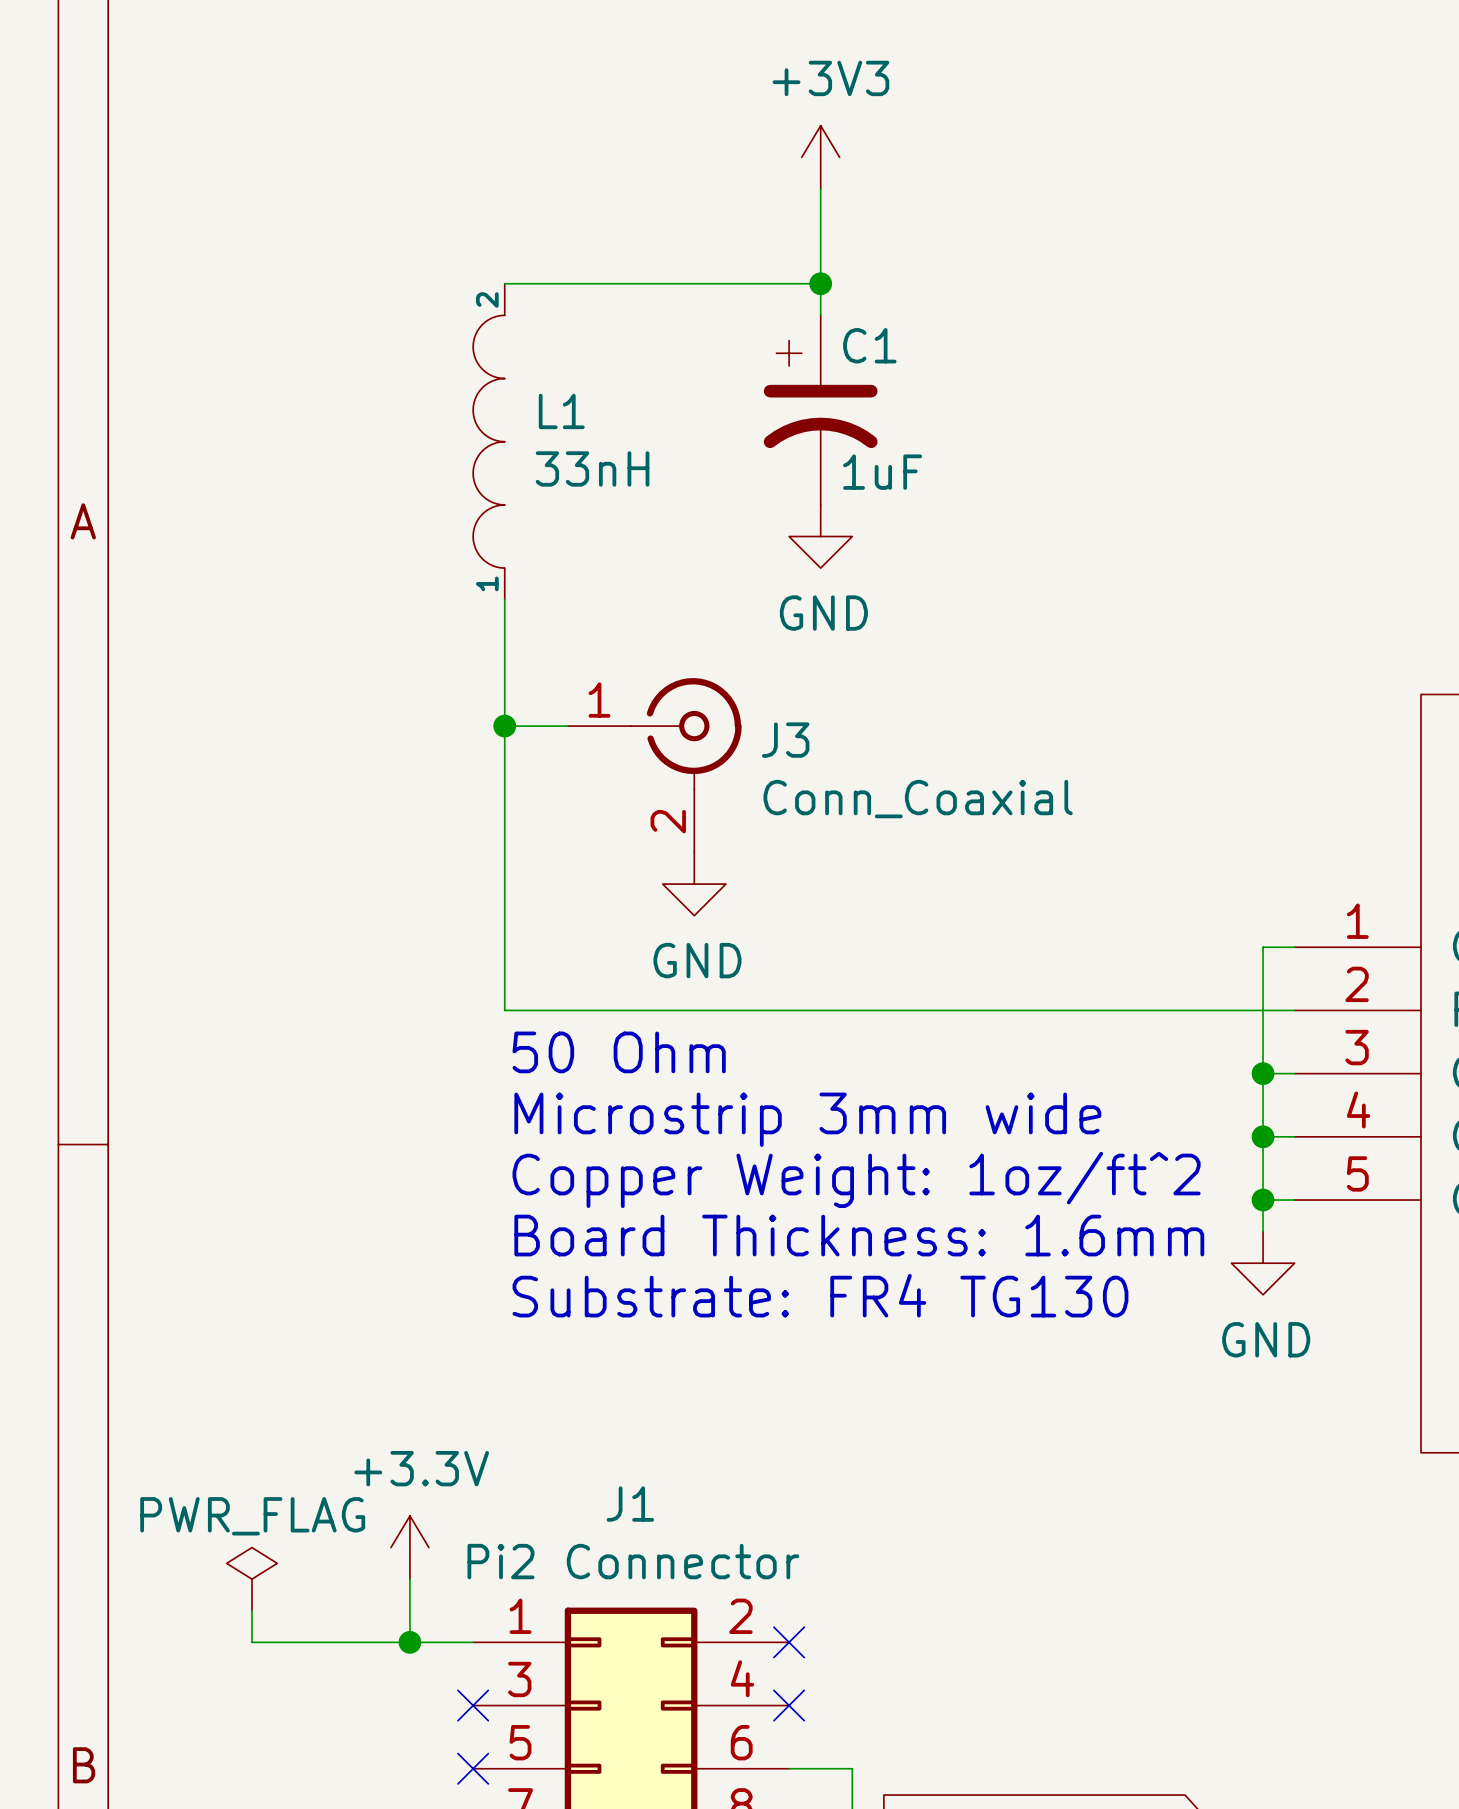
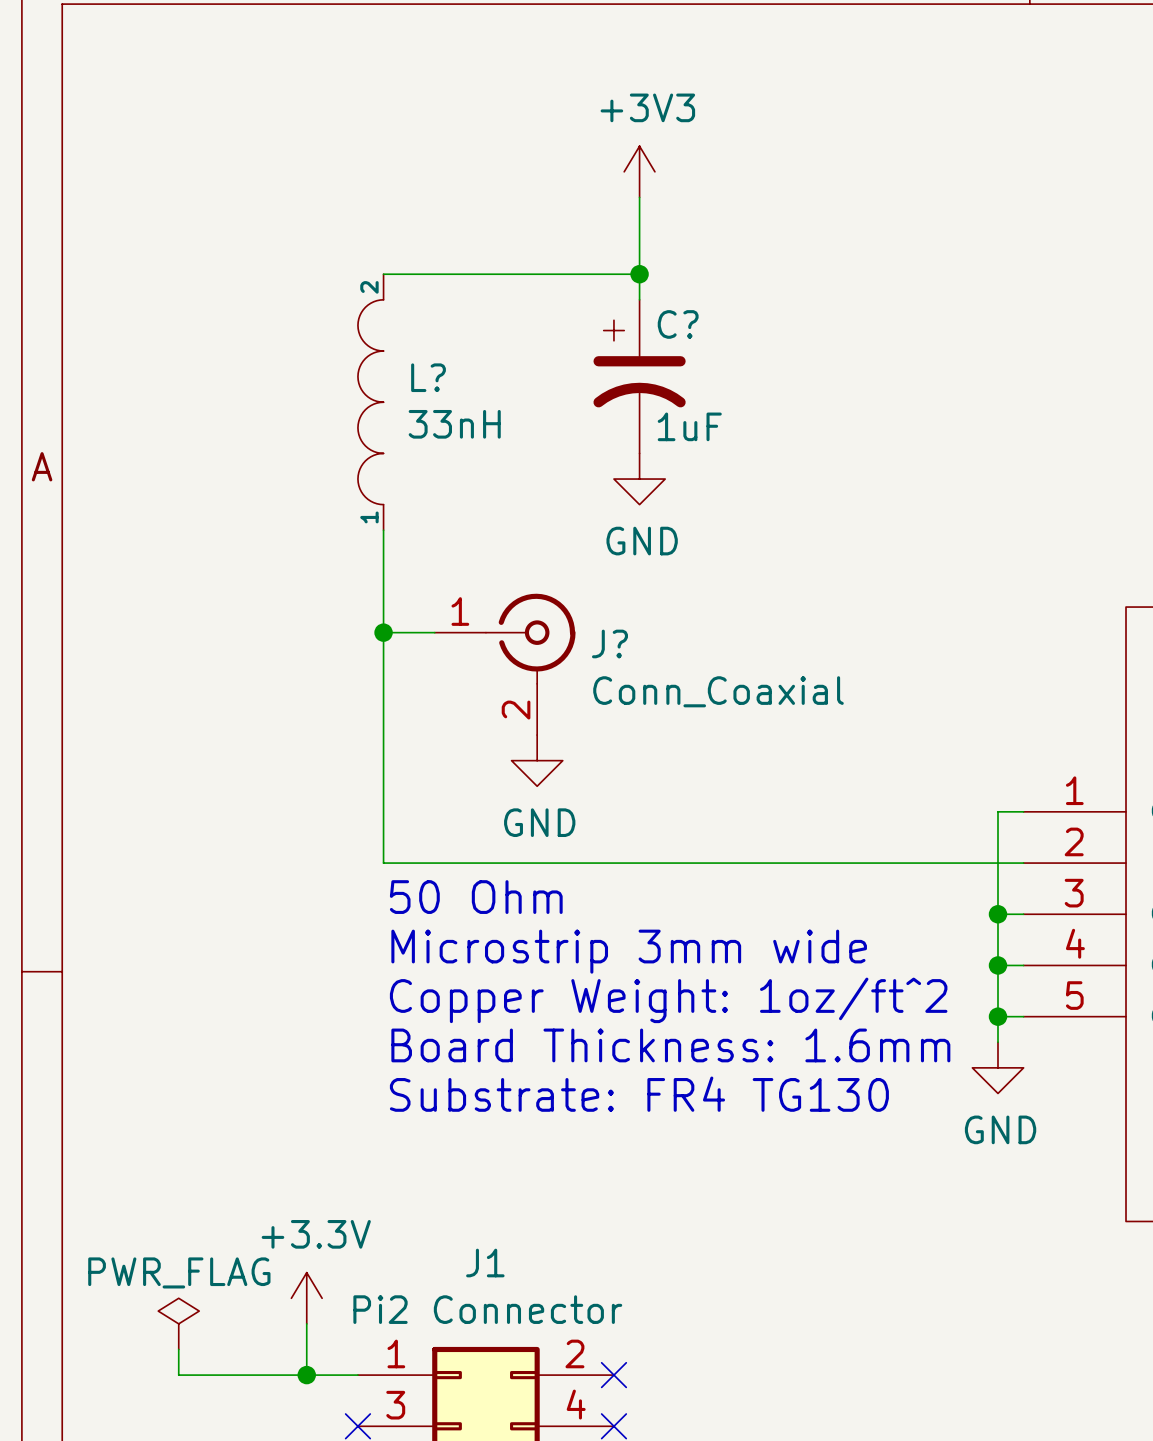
C1 name: C1 (869, 345) -> C? (678, 324)
L1 name: L1 (561, 411) -> L? (428, 377)
J3 name: J3 (785, 740) -> J? (609, 643)

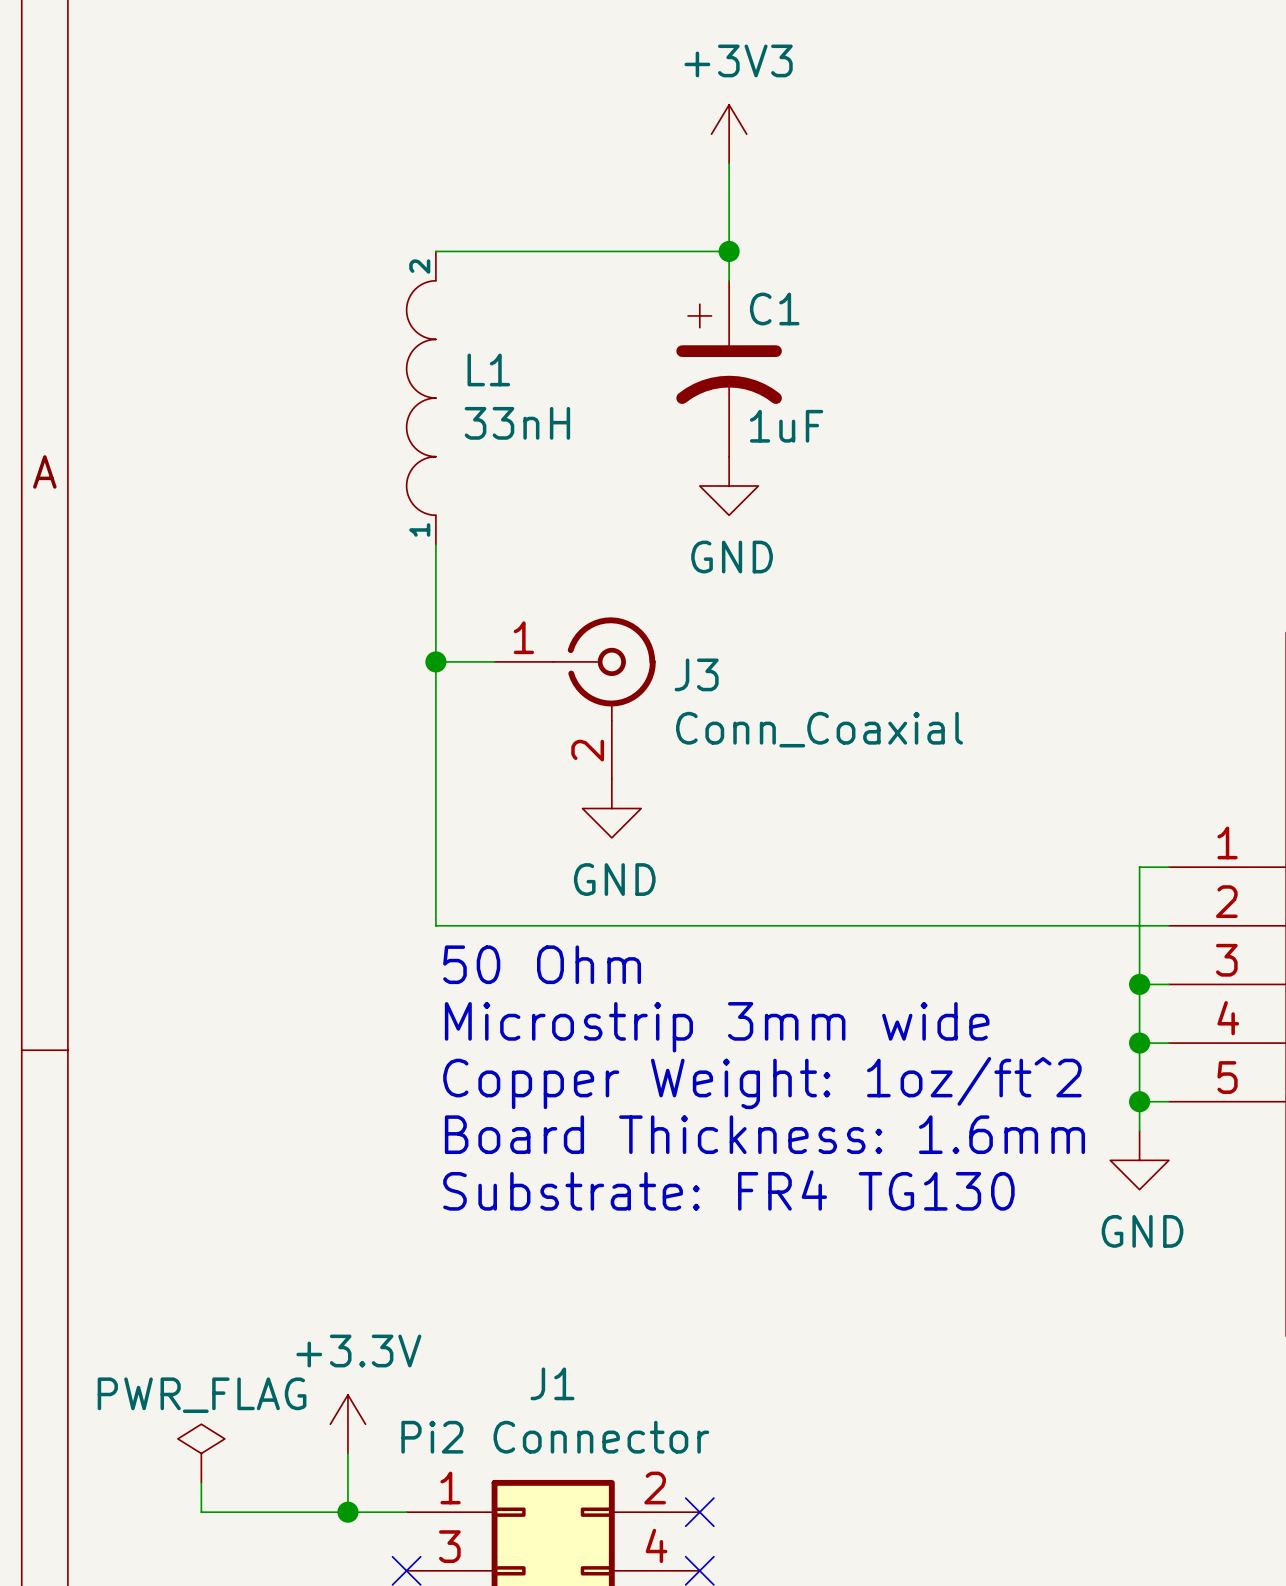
C? name: C? (678, 324) -> C1 (774, 308)
L? name: L? (428, 377) -> L1 (488, 369)
J? name: J? (609, 643) -> J3 (696, 674)

